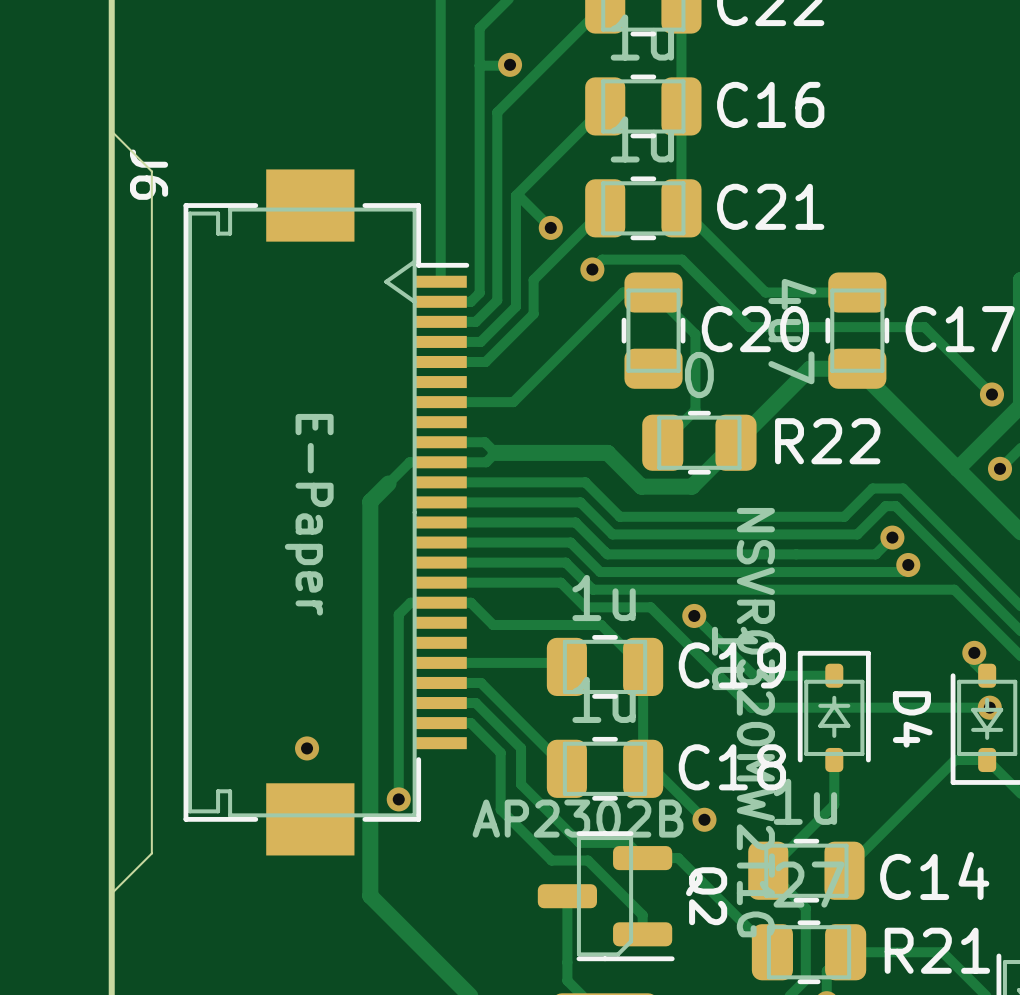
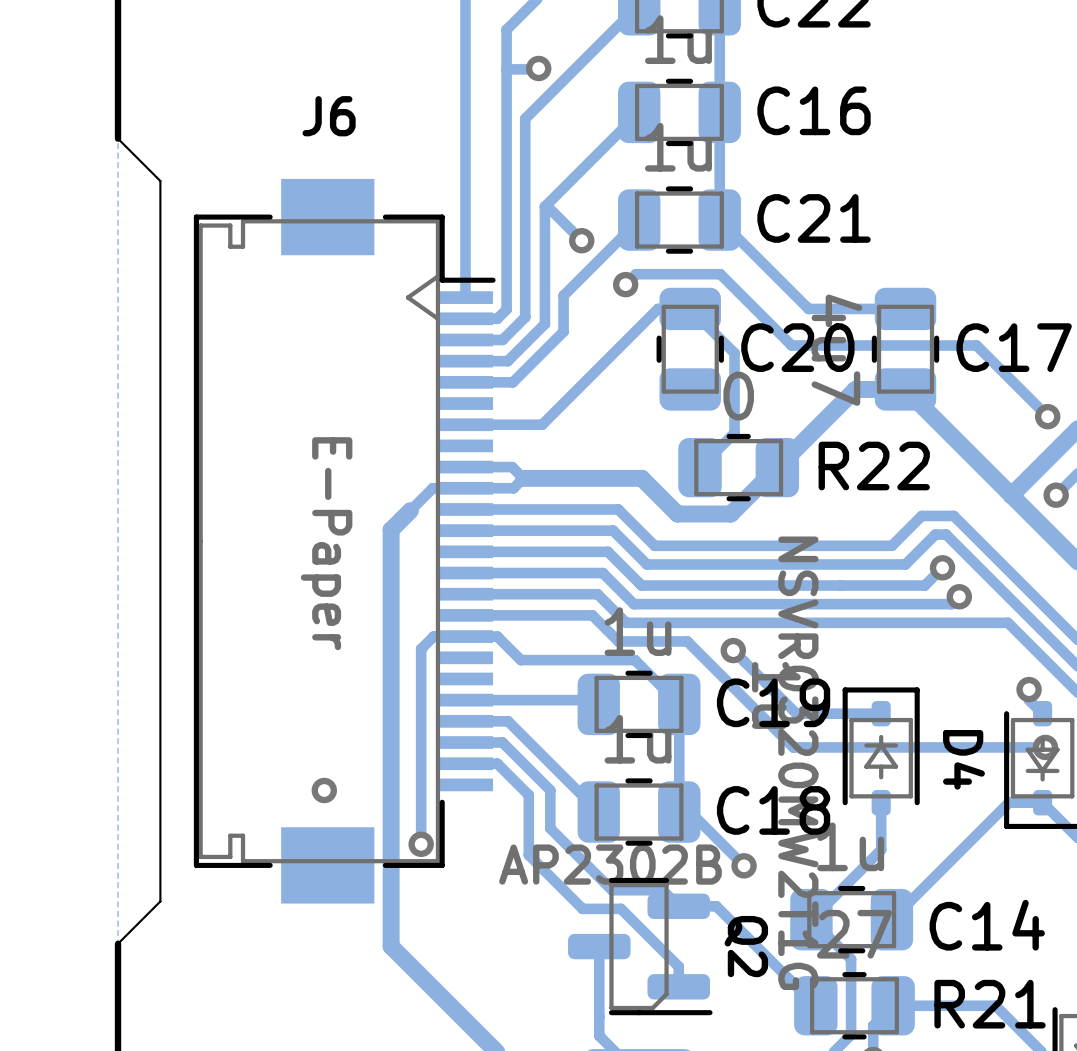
board edge: (111, 131) (111, 893) -> none
J6 name rotation: 0° (149, 174) -> 90° counterclockwise (329, 116)
J6 name position: J6 (149, 174) -> J6 (329, 116)

